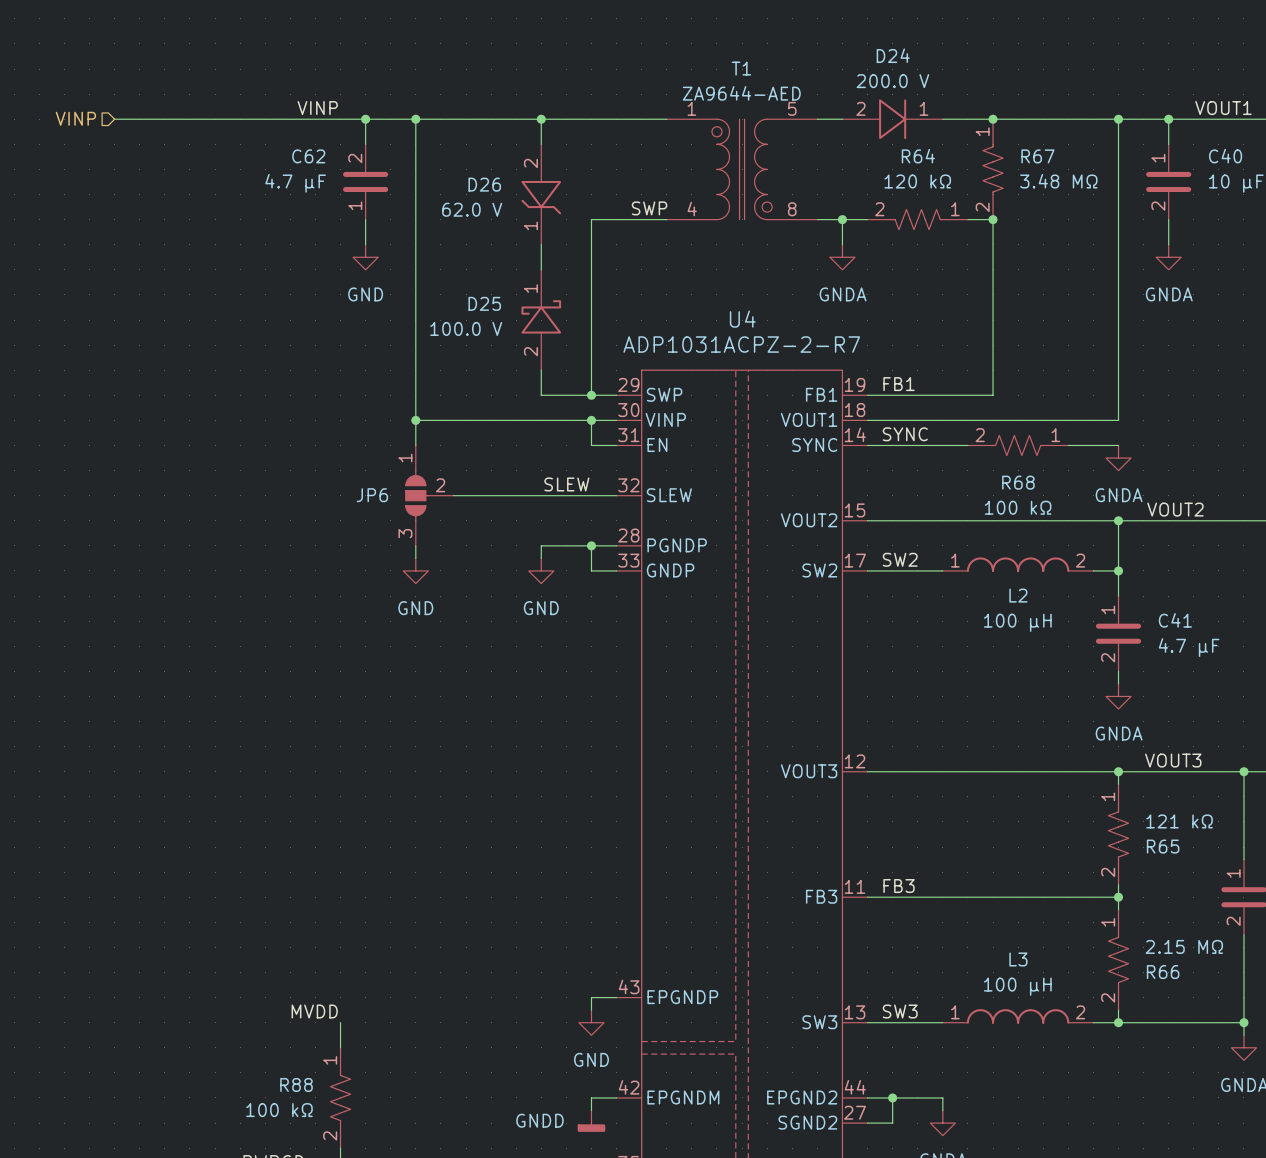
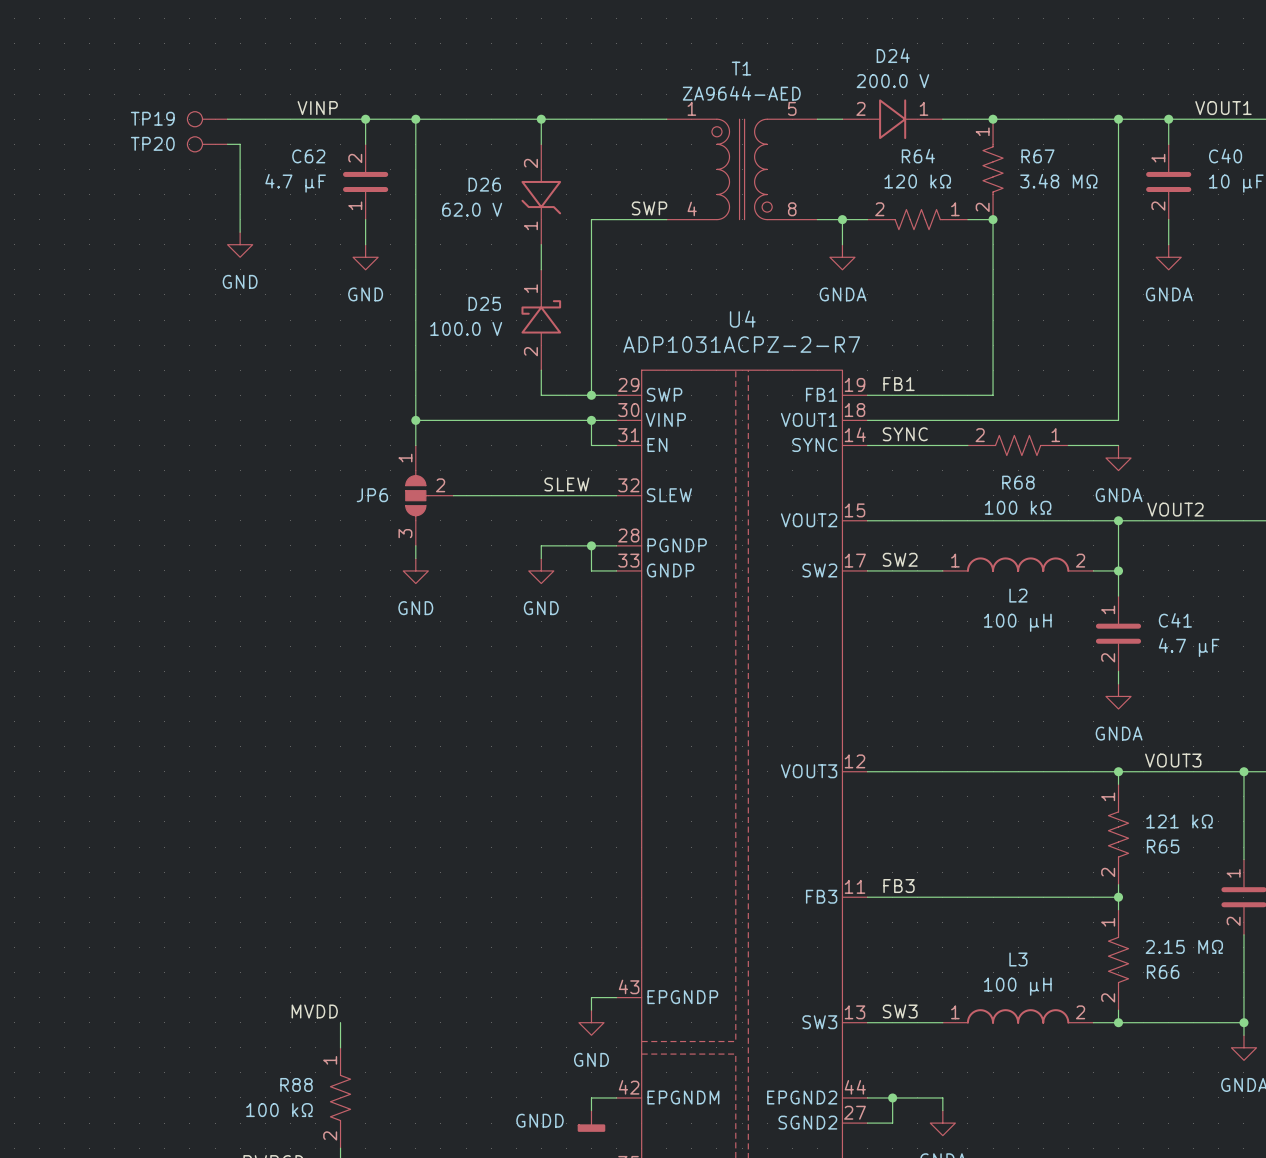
hierarchical label: VINP (75, 118) -> none
wire: (114, 119) (227, 119) -> none
TP19: none -> (207, 119)
TP20: none -> (207, 144)
wire: none -> (227, 144) (240, 144) (240, 232)
power symbol: none -> GND (240, 244)

